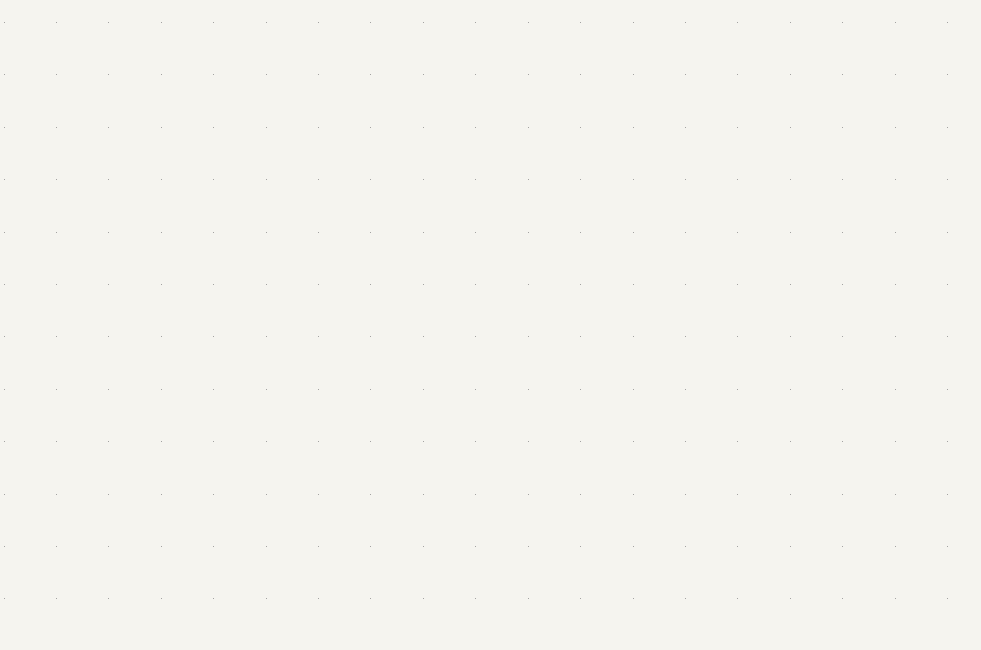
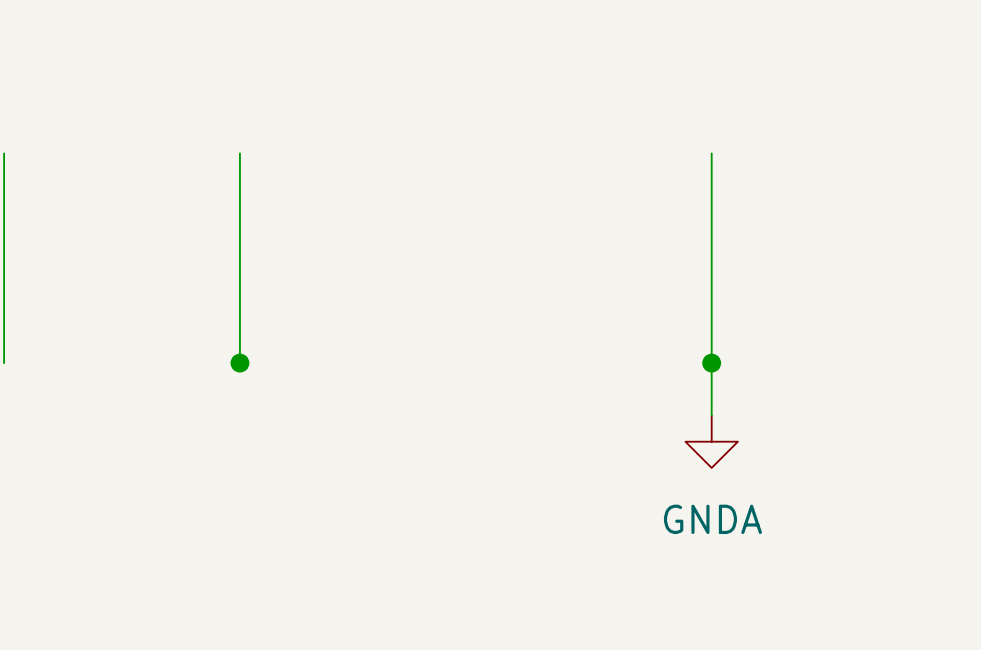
wire: none -> (4, 153) (4, 363)
wire: none -> (239, 153) (239, 363)
wire: none -> (711, 153) (711, 415)
junction: none -> (239, 363)
junction: none -> (711, 363)
power symbol: none -> GNDA (711, 441)

